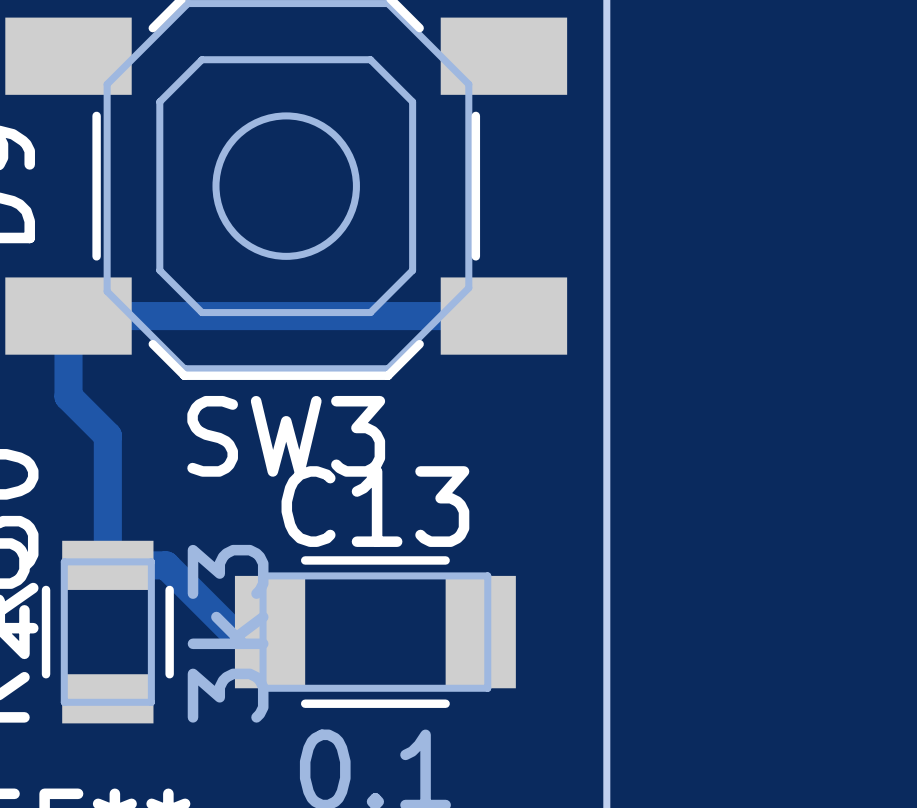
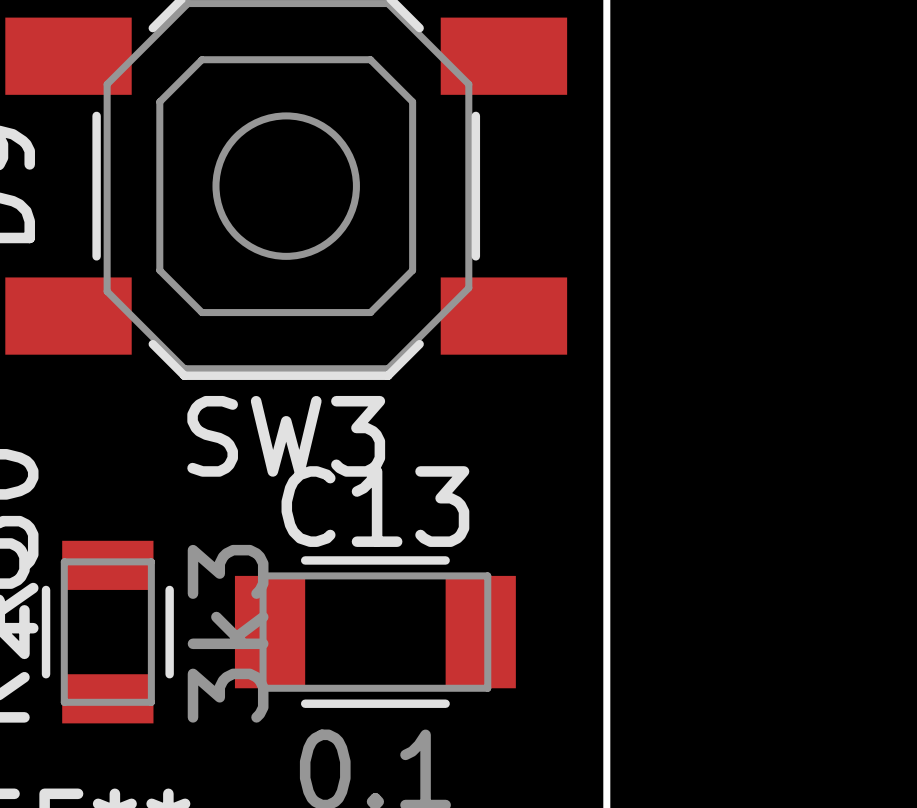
track: (503, 316) (68, 316) (68, 396) (107, 435) (107, 565) (165, 565) (232, 632) (270, 632) -> none

